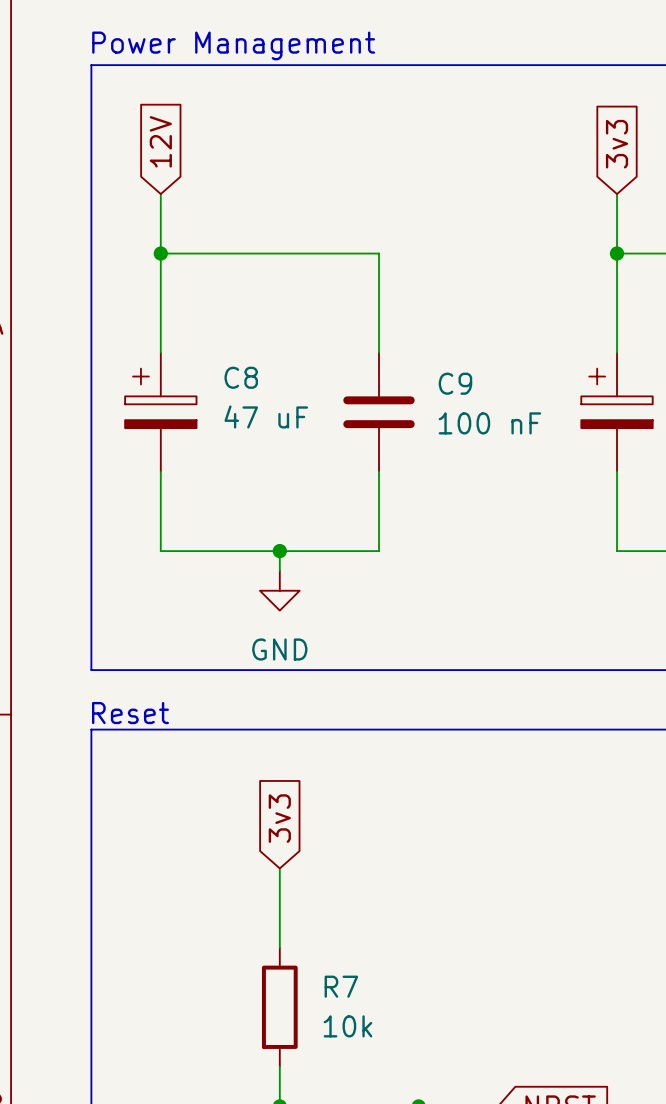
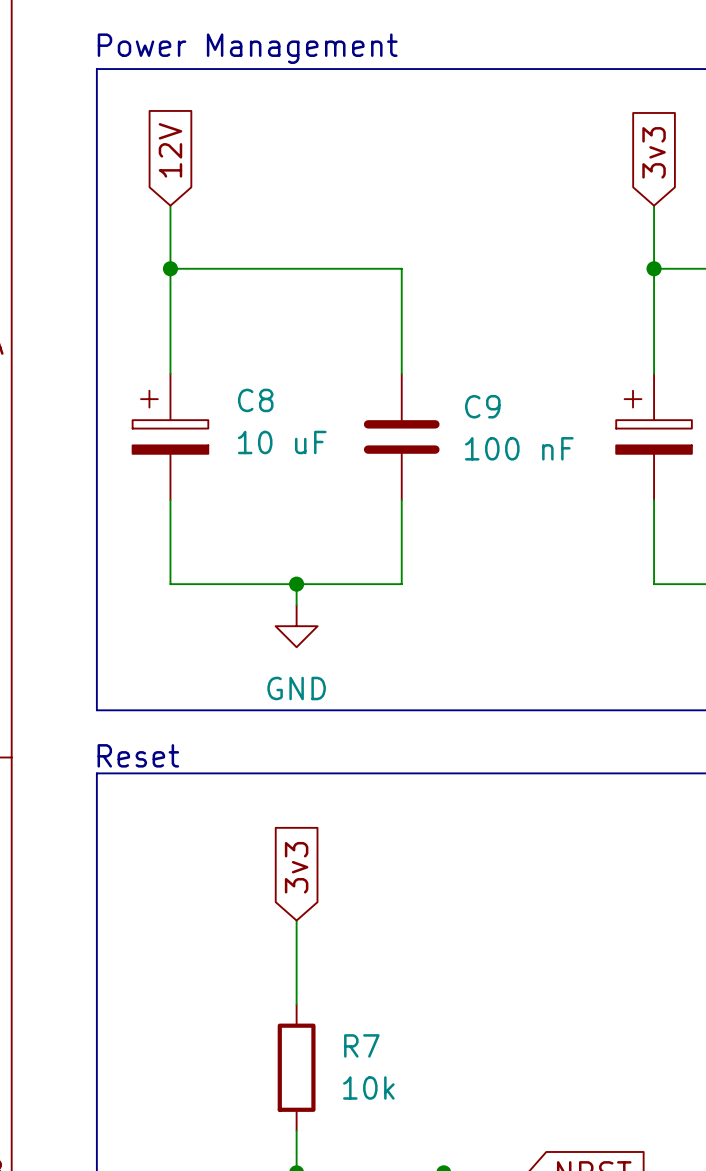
C8 value: 47 uF (266, 416) -> 10 uF (282, 442)

